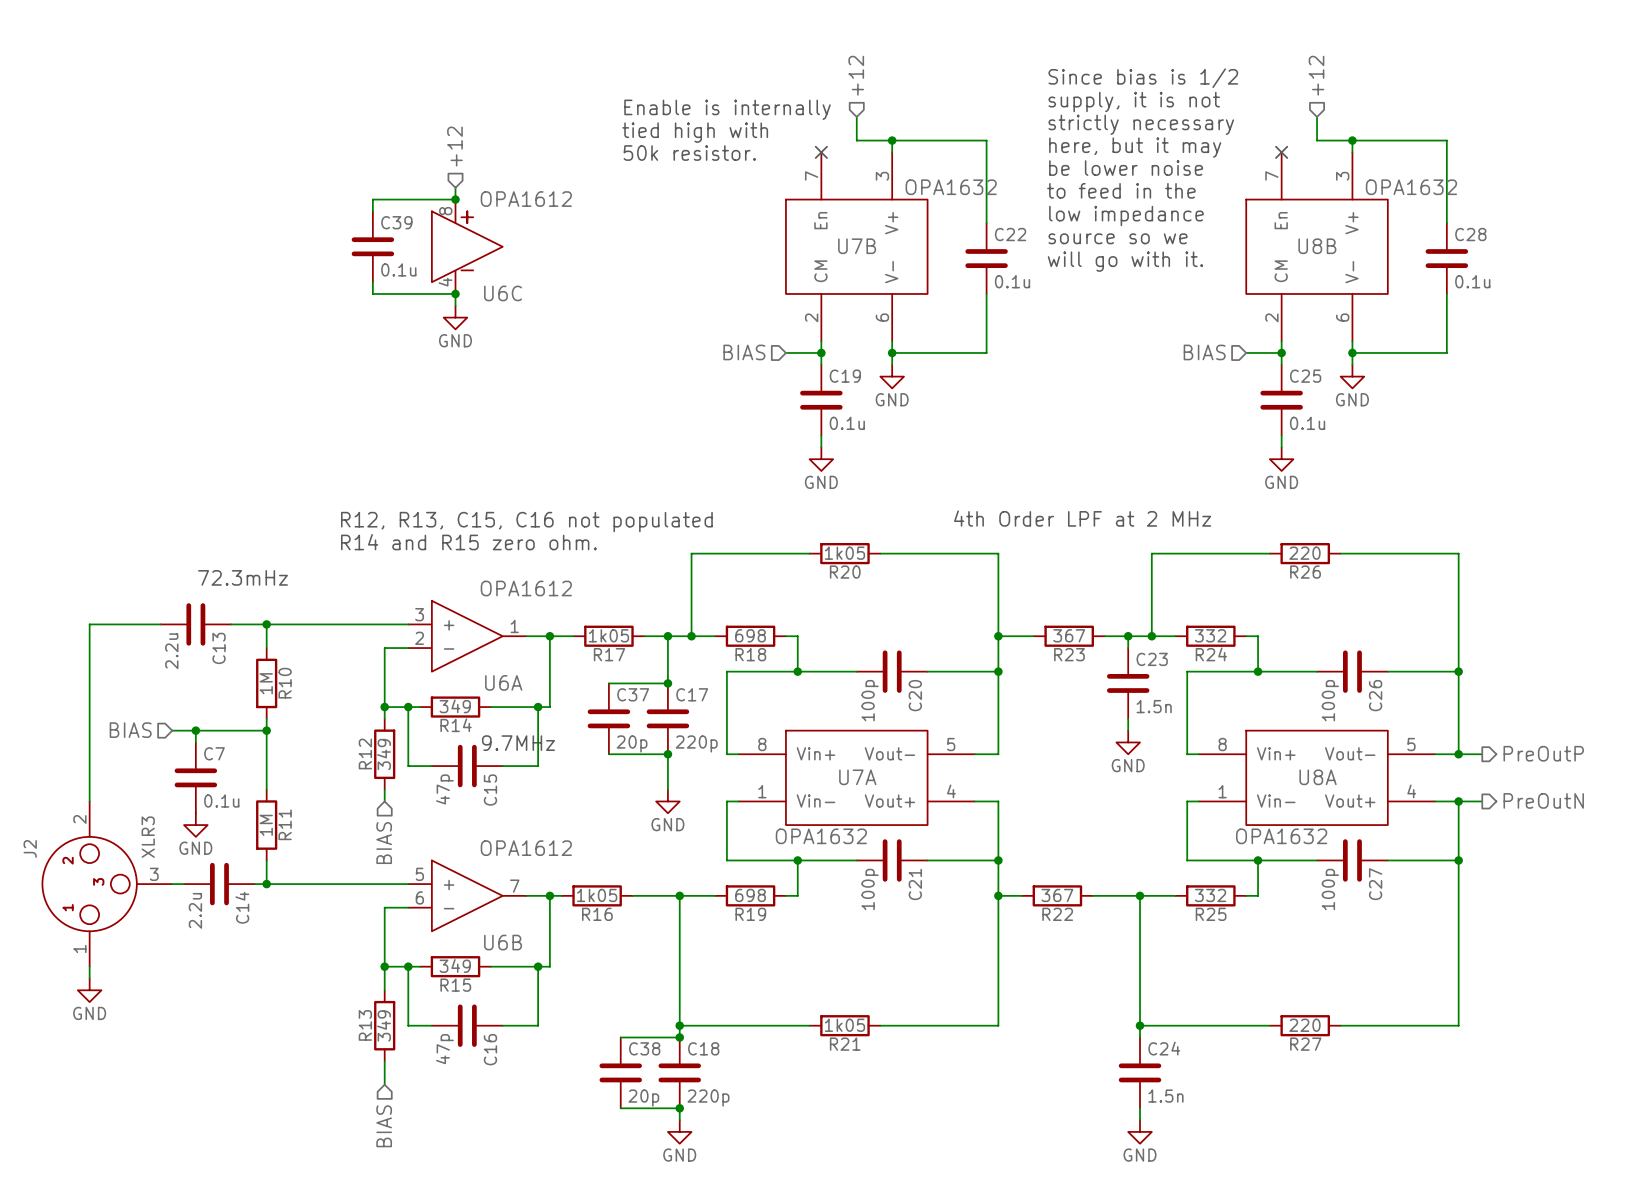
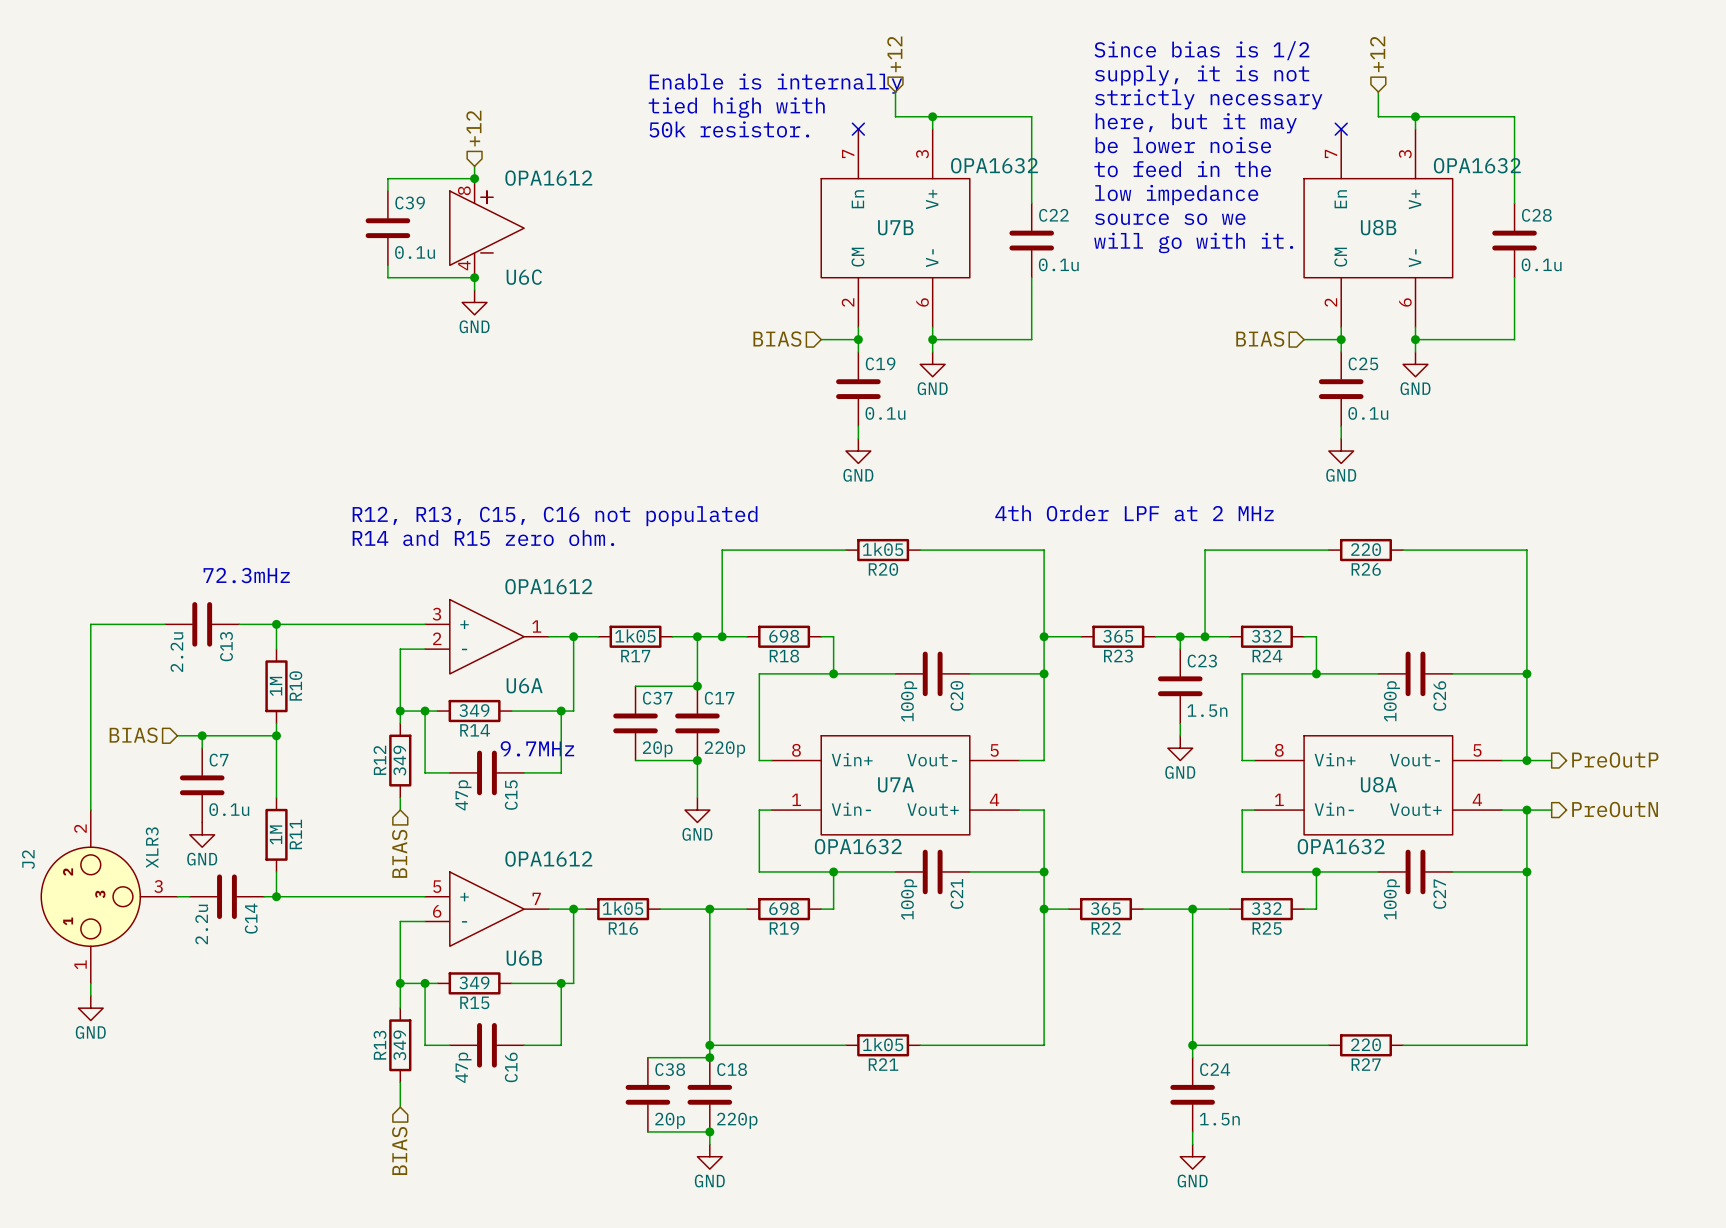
R23 value: 367 (1069, 635) -> 365 (1118, 636)
R22 value: 367 (1057, 895) -> 365 (1105, 908)

